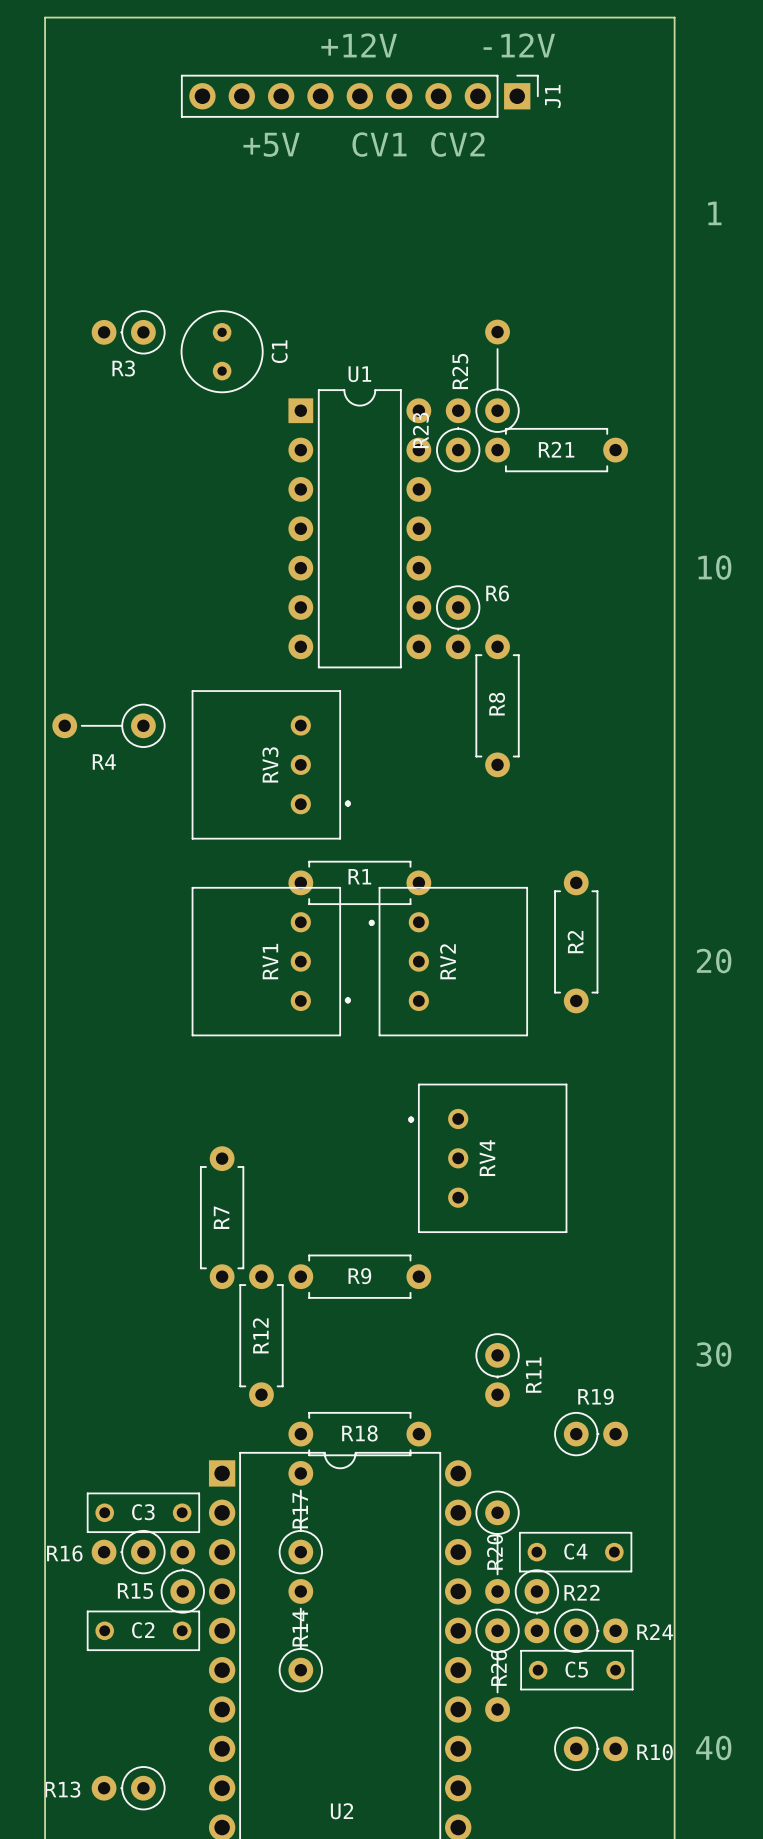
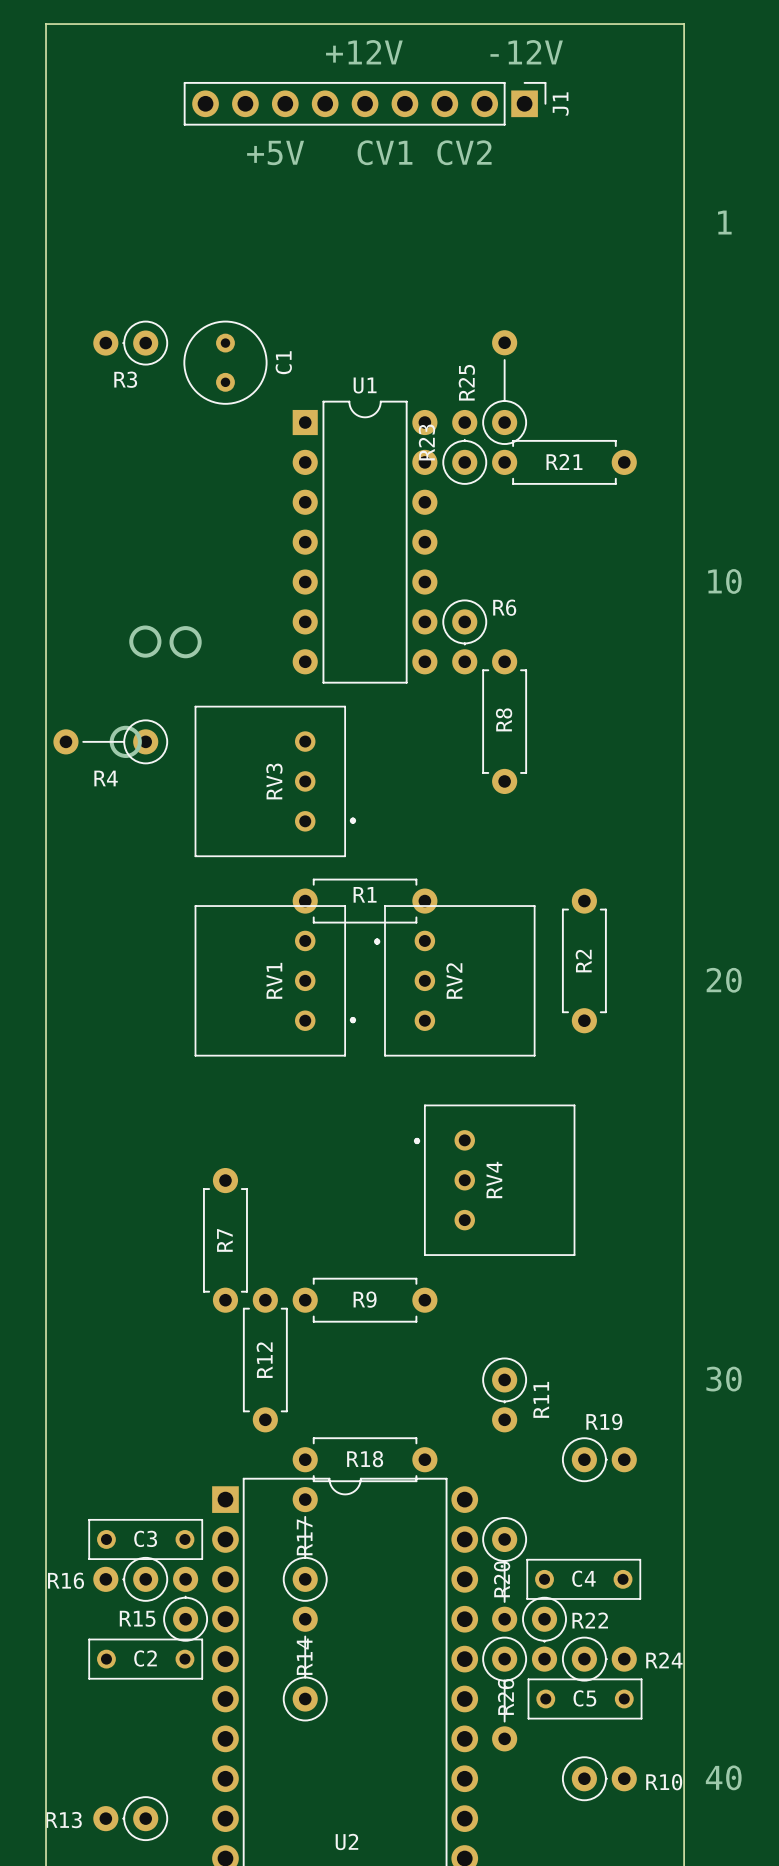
drawing: none -> [129, 625, 202, 659]
drawing: none -> [109, 725, 142, 758]

